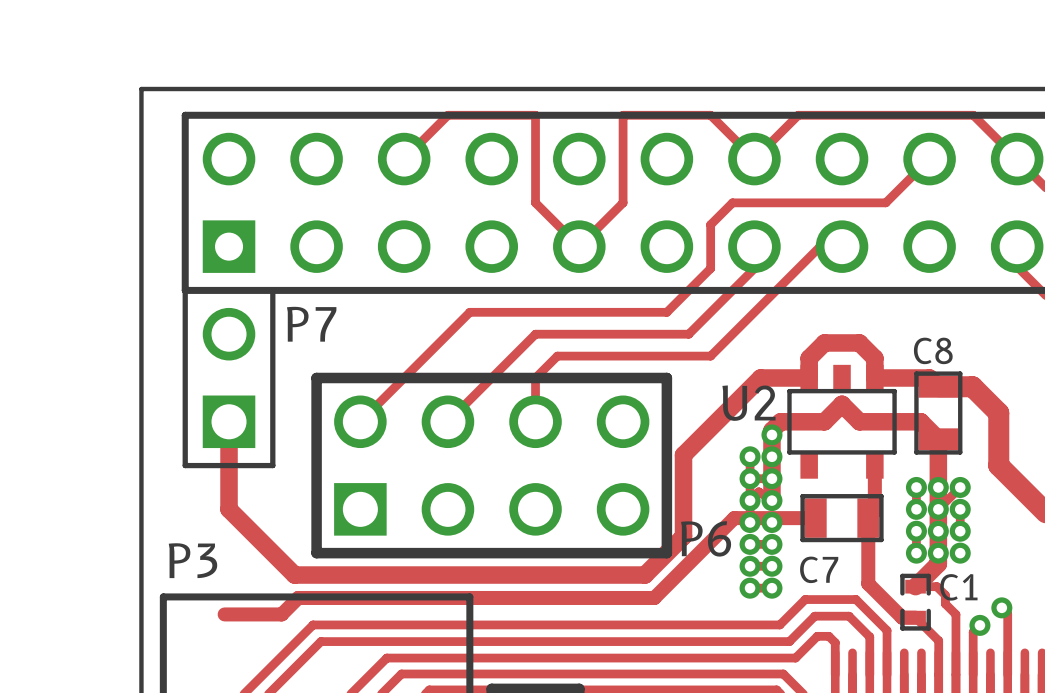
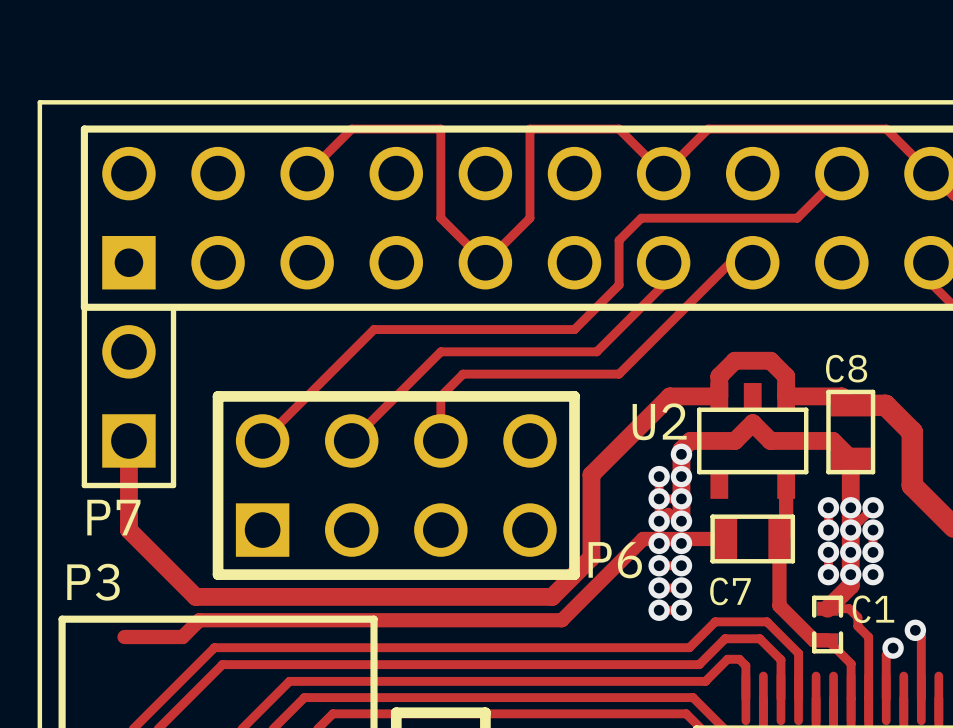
P7 name position: P7 (311, 324) -> P7 (113, 517)

